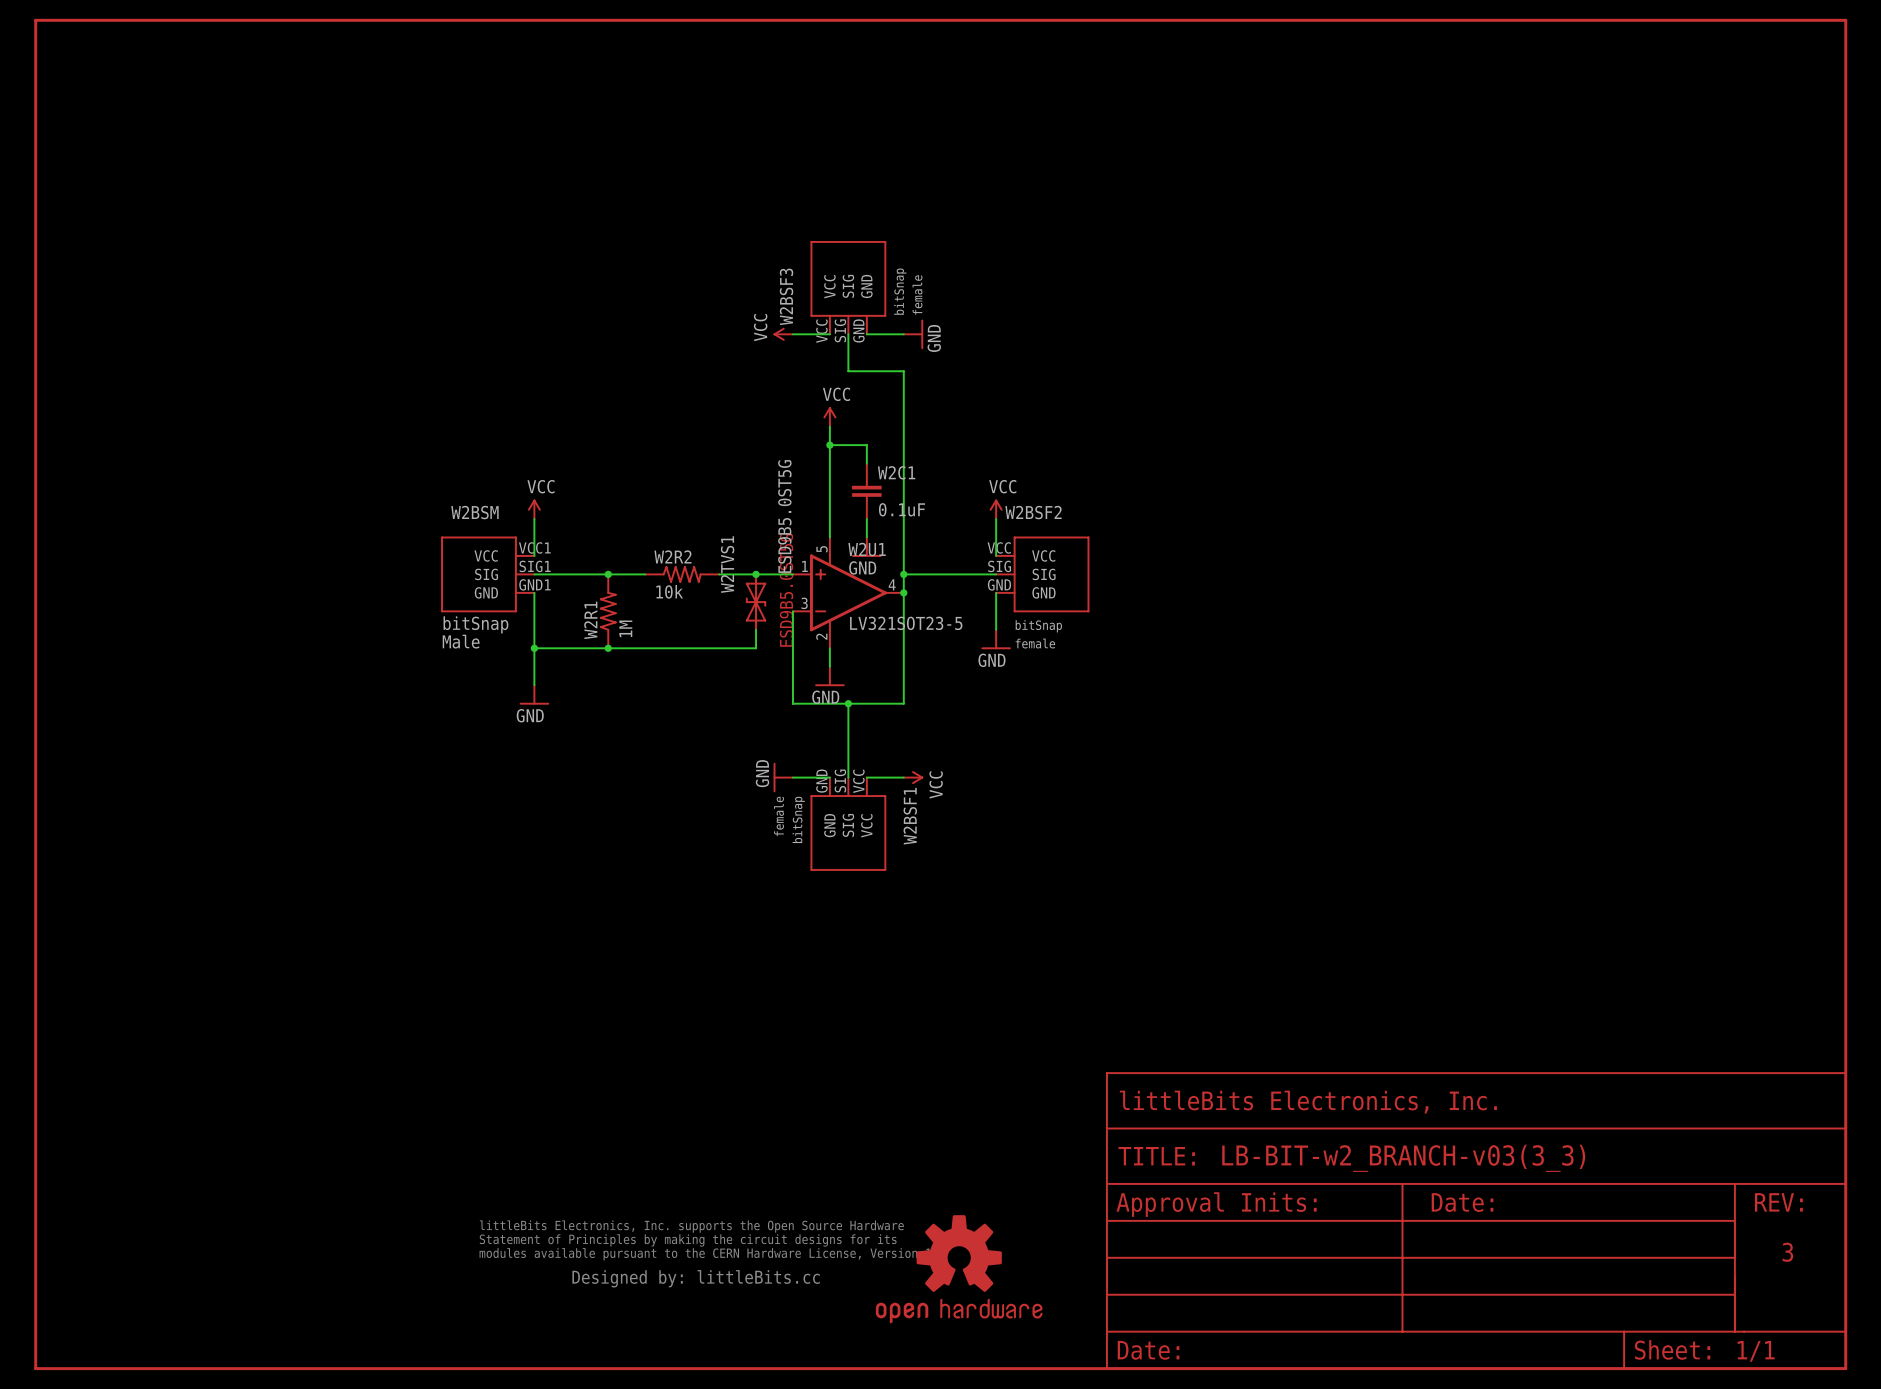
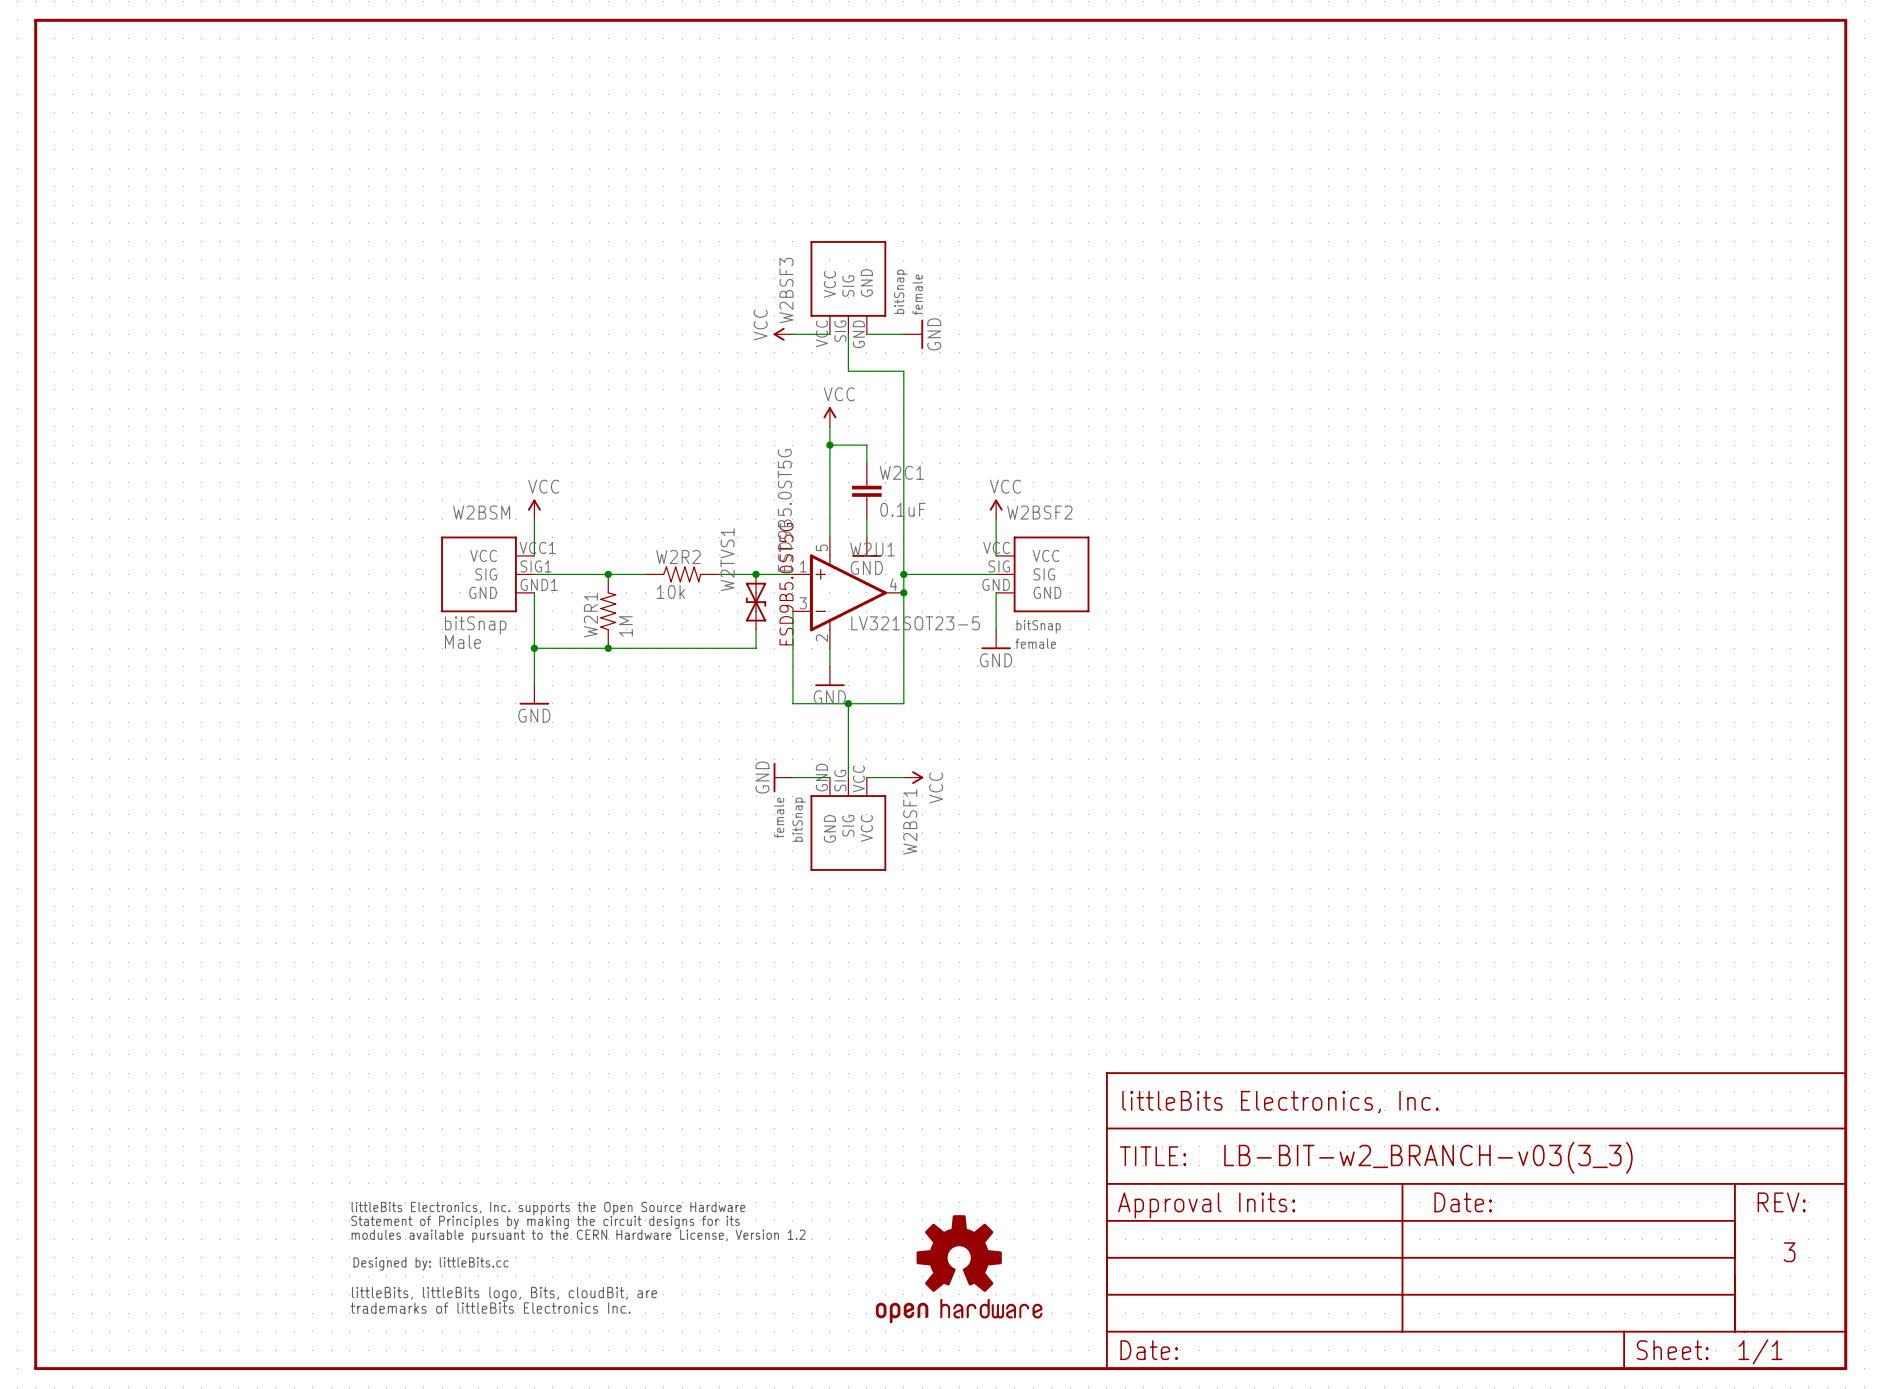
part: (712, 1253) -> none
part: none -> (578, 1257)

